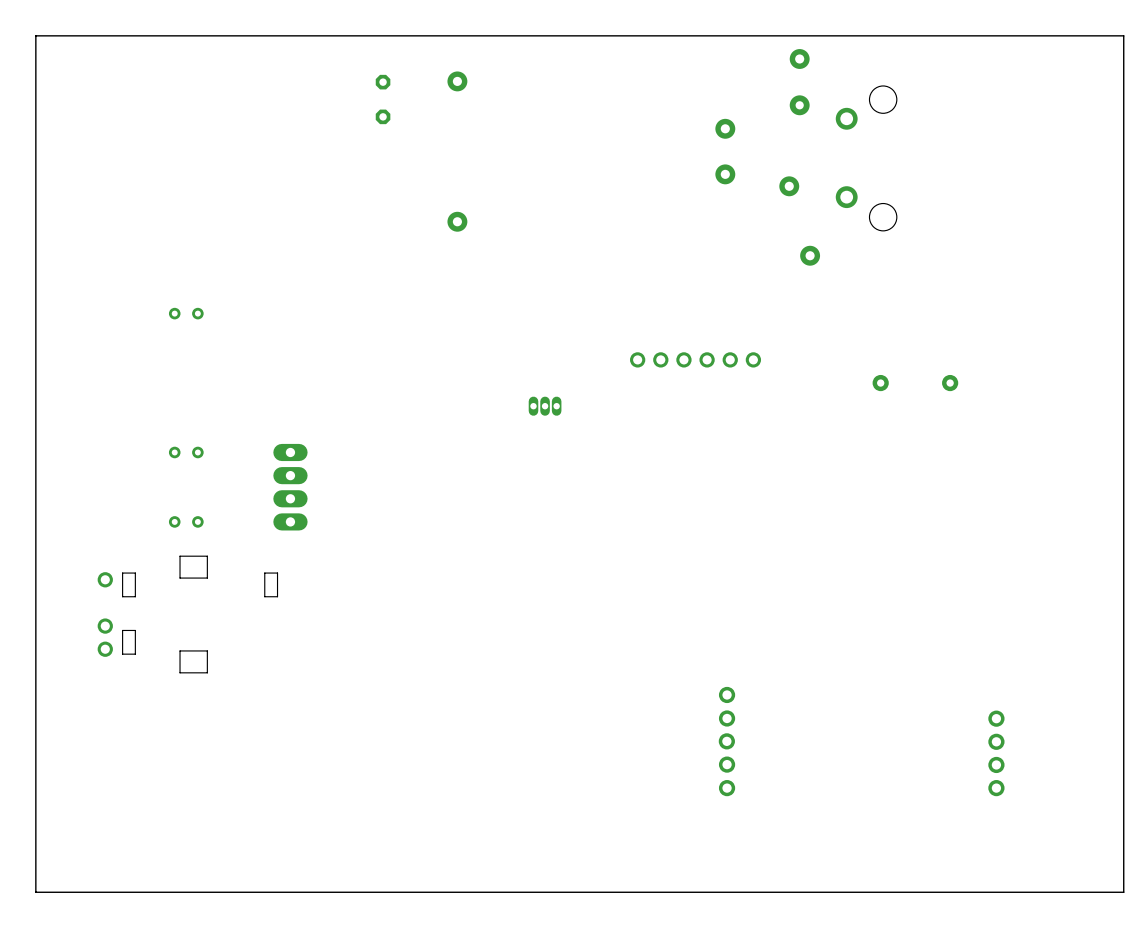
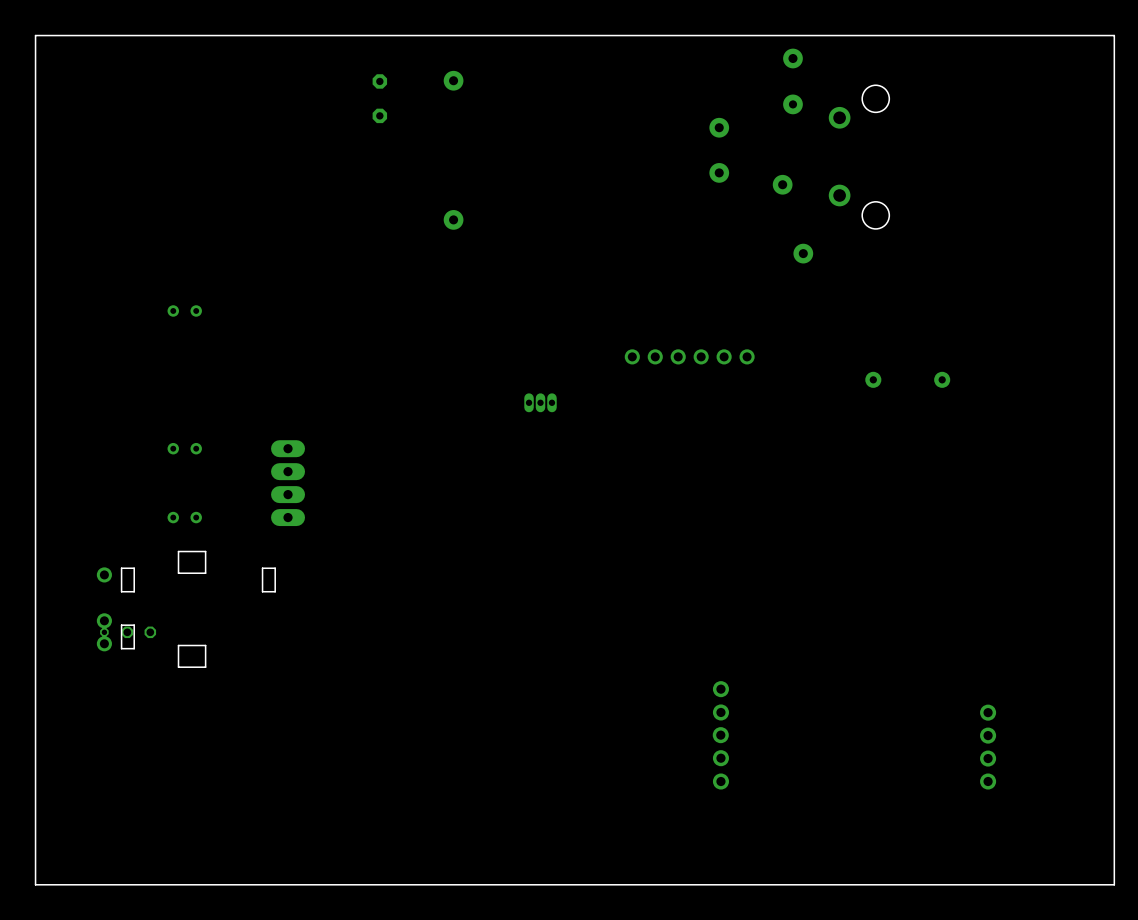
part: none -> (128, 632)

